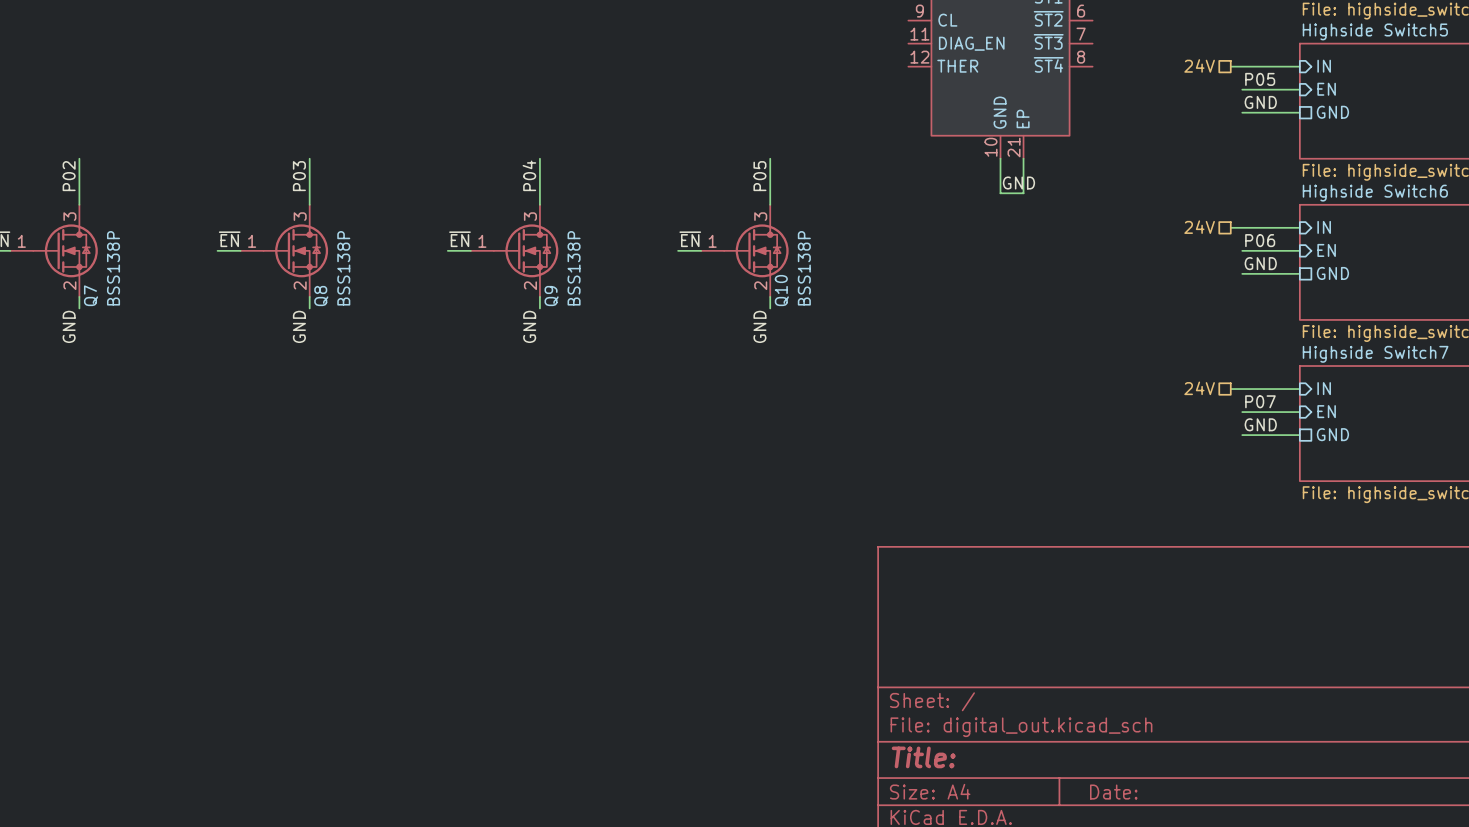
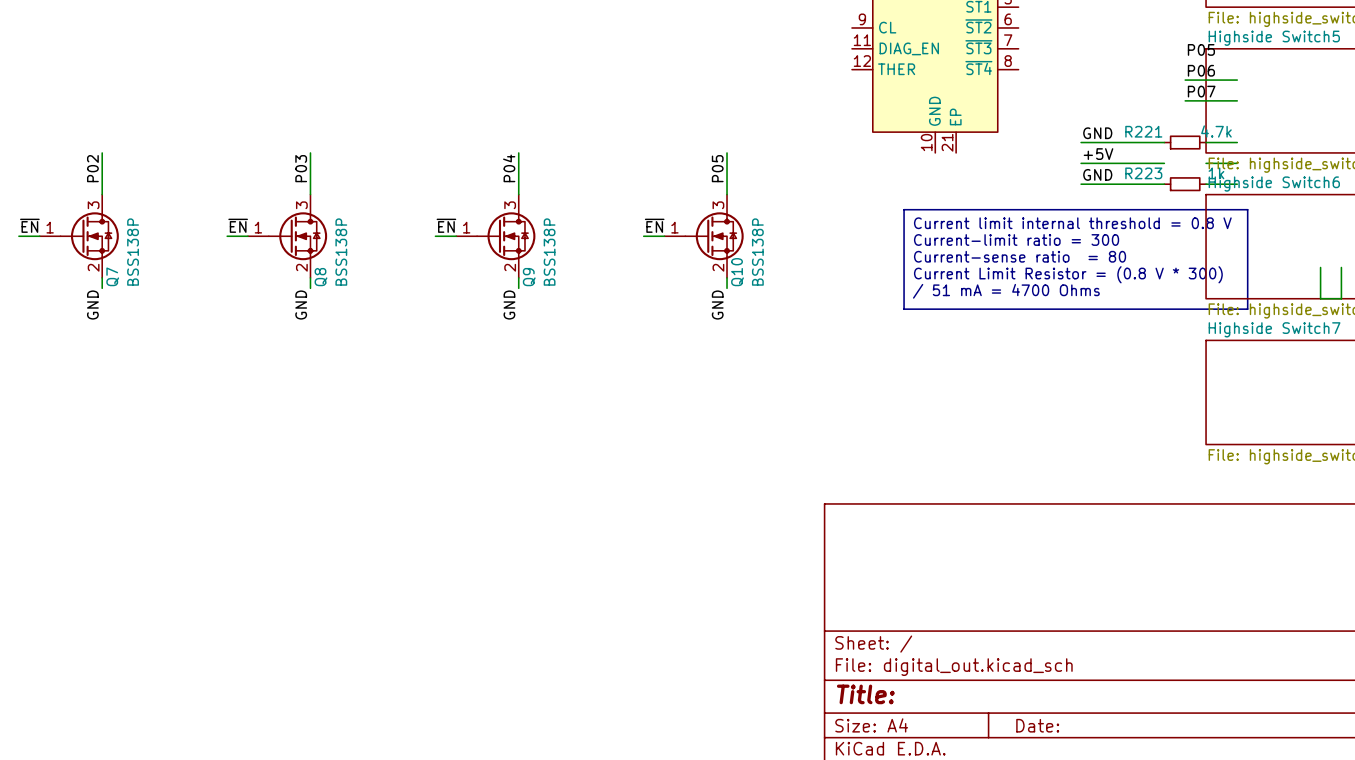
hierarchical label: 24V (1199, 65) -> none
wire: (1230, 66) (1299, 66) -> none
sheet pin: IN (1324, 66) -> none
label position: P05 (1260, 79) -> P05 (1201, 49)
wire: (1242, 89) (1299, 89) -> (1185, 80) (1237, 80)
sheet pin: EN (1326, 89) -> none
label: none -> P07 (1201, 91)
label: GND (1260, 102) -> none
wire: (1242, 112) (1299, 112) -> (1185, 100) (1237, 100)
sheet pin: GND (1332, 112) -> none
label: none -> GND (1097, 133)
wire: none -> (1081, 142) (1164, 142)
R221: none -> 4.7k (1185, 142)
wire: none -> (1206, 142) (1237, 142)
wire: (1000, 158) (1000, 193) (1023, 193) (1023, 158) -> none
label: none -> +5V (1098, 154)
wire: none -> (1081, 163) (1164, 163)
wire: none -> (1206, 163) (1237, 163)
label: GND (1018, 183) -> none
label: none -> GND (1097, 174)
wire: none -> (1081, 184) (1164, 184)
R223: none -> 1k (1185, 184)
wire: none -> (1206, 184) (1237, 184)
line: none -> (904, 209) (1247, 209) (1247, 309) (904, 309) (904, 209)
hierarchical label: 24V (1199, 227) -> none
wire: (1230, 227) (1299, 227) -> none
sheet pin: IN (1324, 227) -> none
text: none -> Current limit internal threshold = 0.8 V (1072, 223)
label position: P06 (1260, 240) -> P06 (1201, 70)
wire: (1242, 250) (1299, 250) -> none
sheet pin: EN (1326, 250) -> none
text: none -> Current-limit ratio = 300 (1016, 239)
label: GND (1260, 263) -> none
text: none -> Current-sense ratio = 80 (1020, 256)
wire: (1242, 273) (1299, 273) -> none
sheet pin: GND (1332, 273) -> none
wire: none -> (1320, 267) (1320, 298) (1341, 298) (1341, 267)
text: none -> Current Limit Resistor = (0.8 V * 300) (1068, 274)
text: none -> / 51 mA = 4700 Ohms (1006, 291)
hierarchical label: 24V (1199, 388) -> none
sheet pin: IN (1324, 388) -> none
wire: (1230, 389) (1299, 389) -> none
label: P07 (1260, 401) -> none
sheet pin: EN (1326, 411) -> none
wire: (1242, 412) (1299, 412) -> none
label: GND (1260, 424) -> none
sheet pin: GND (1332, 434) -> none
wire: (1242, 435) (1299, 435) -> none

